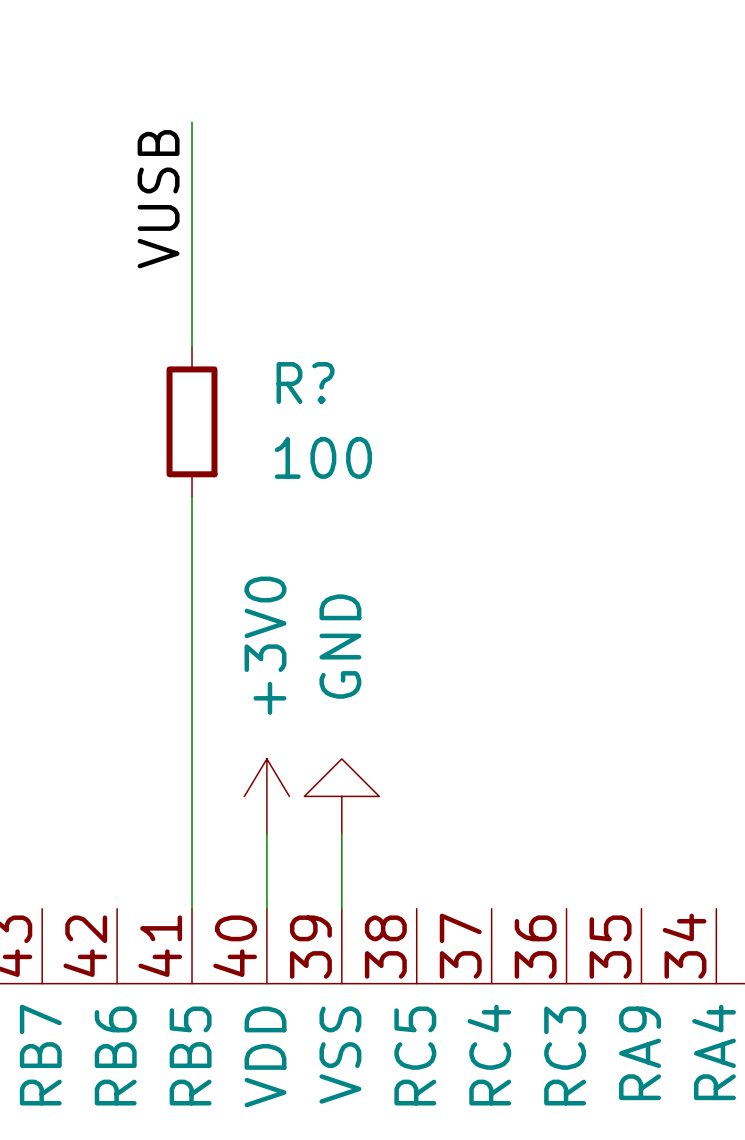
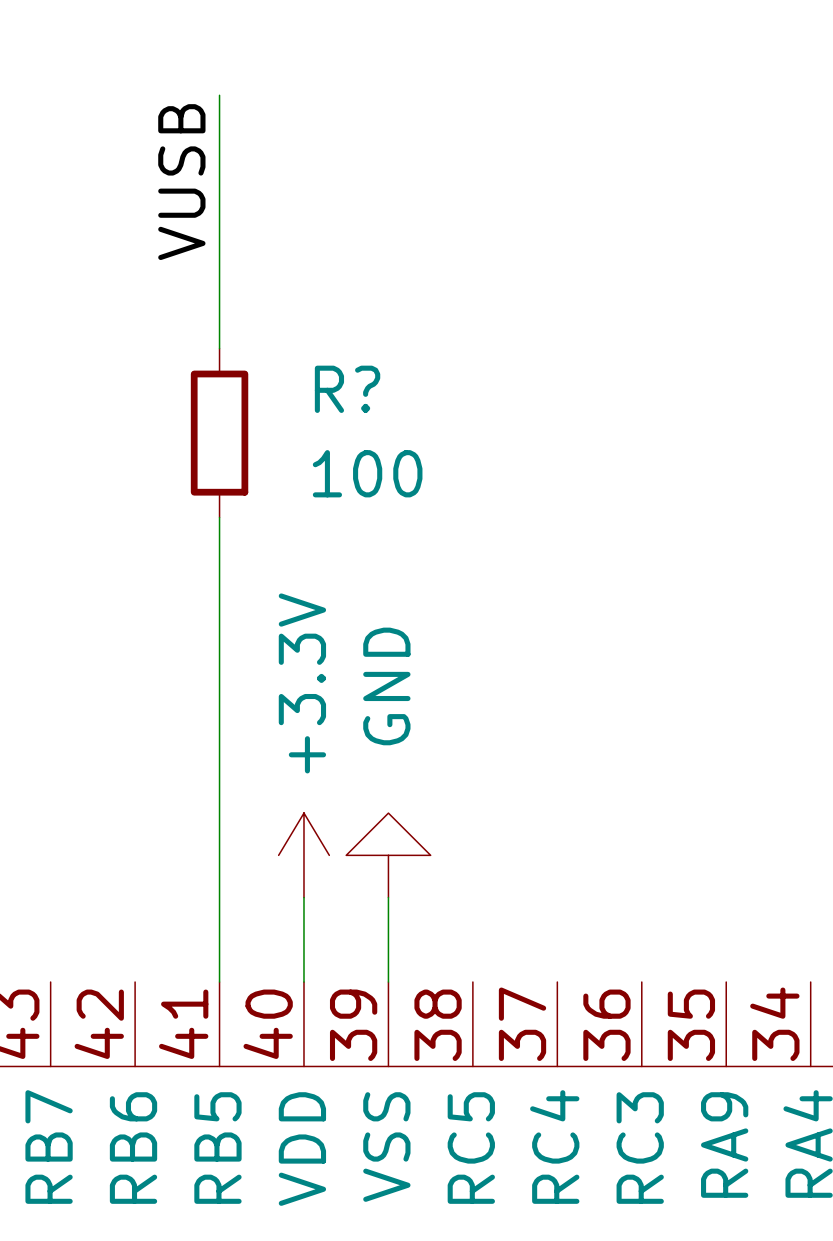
power symbol: +3V0 (266, 796) -> +3.3V (303, 855)

